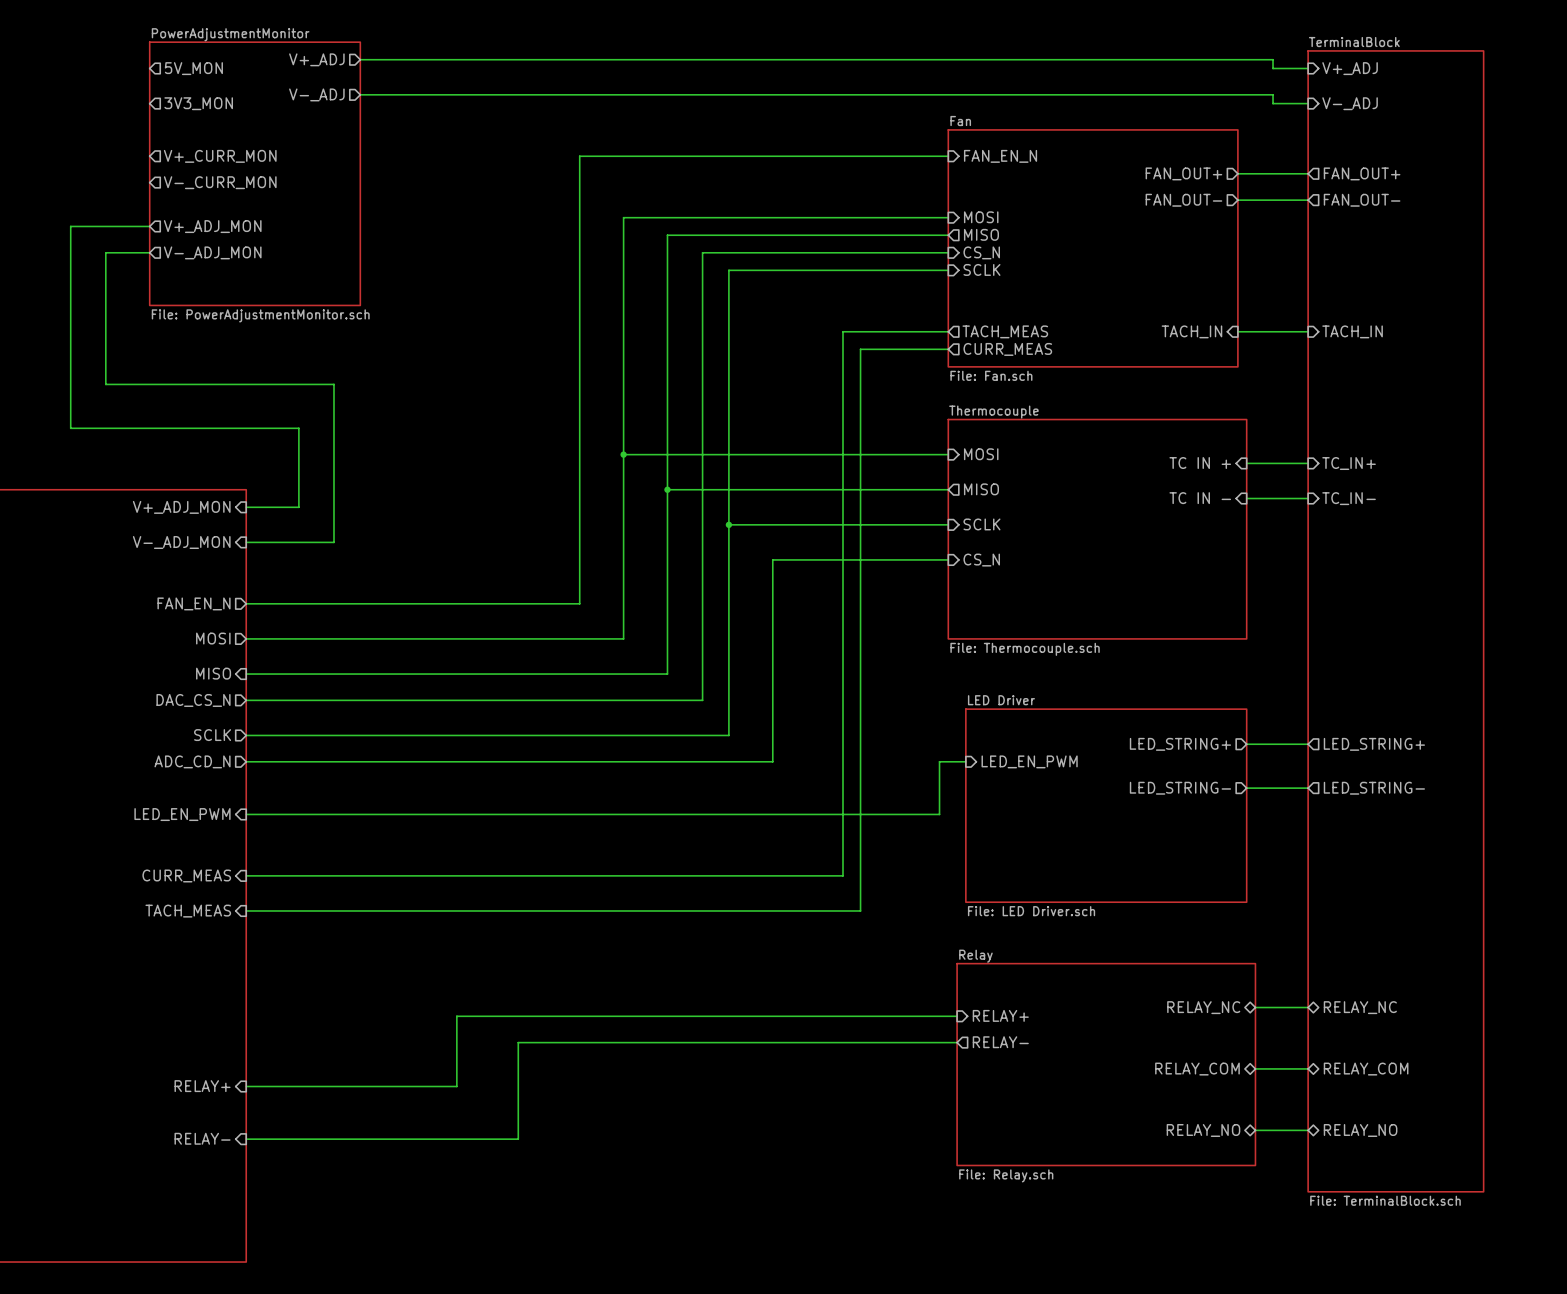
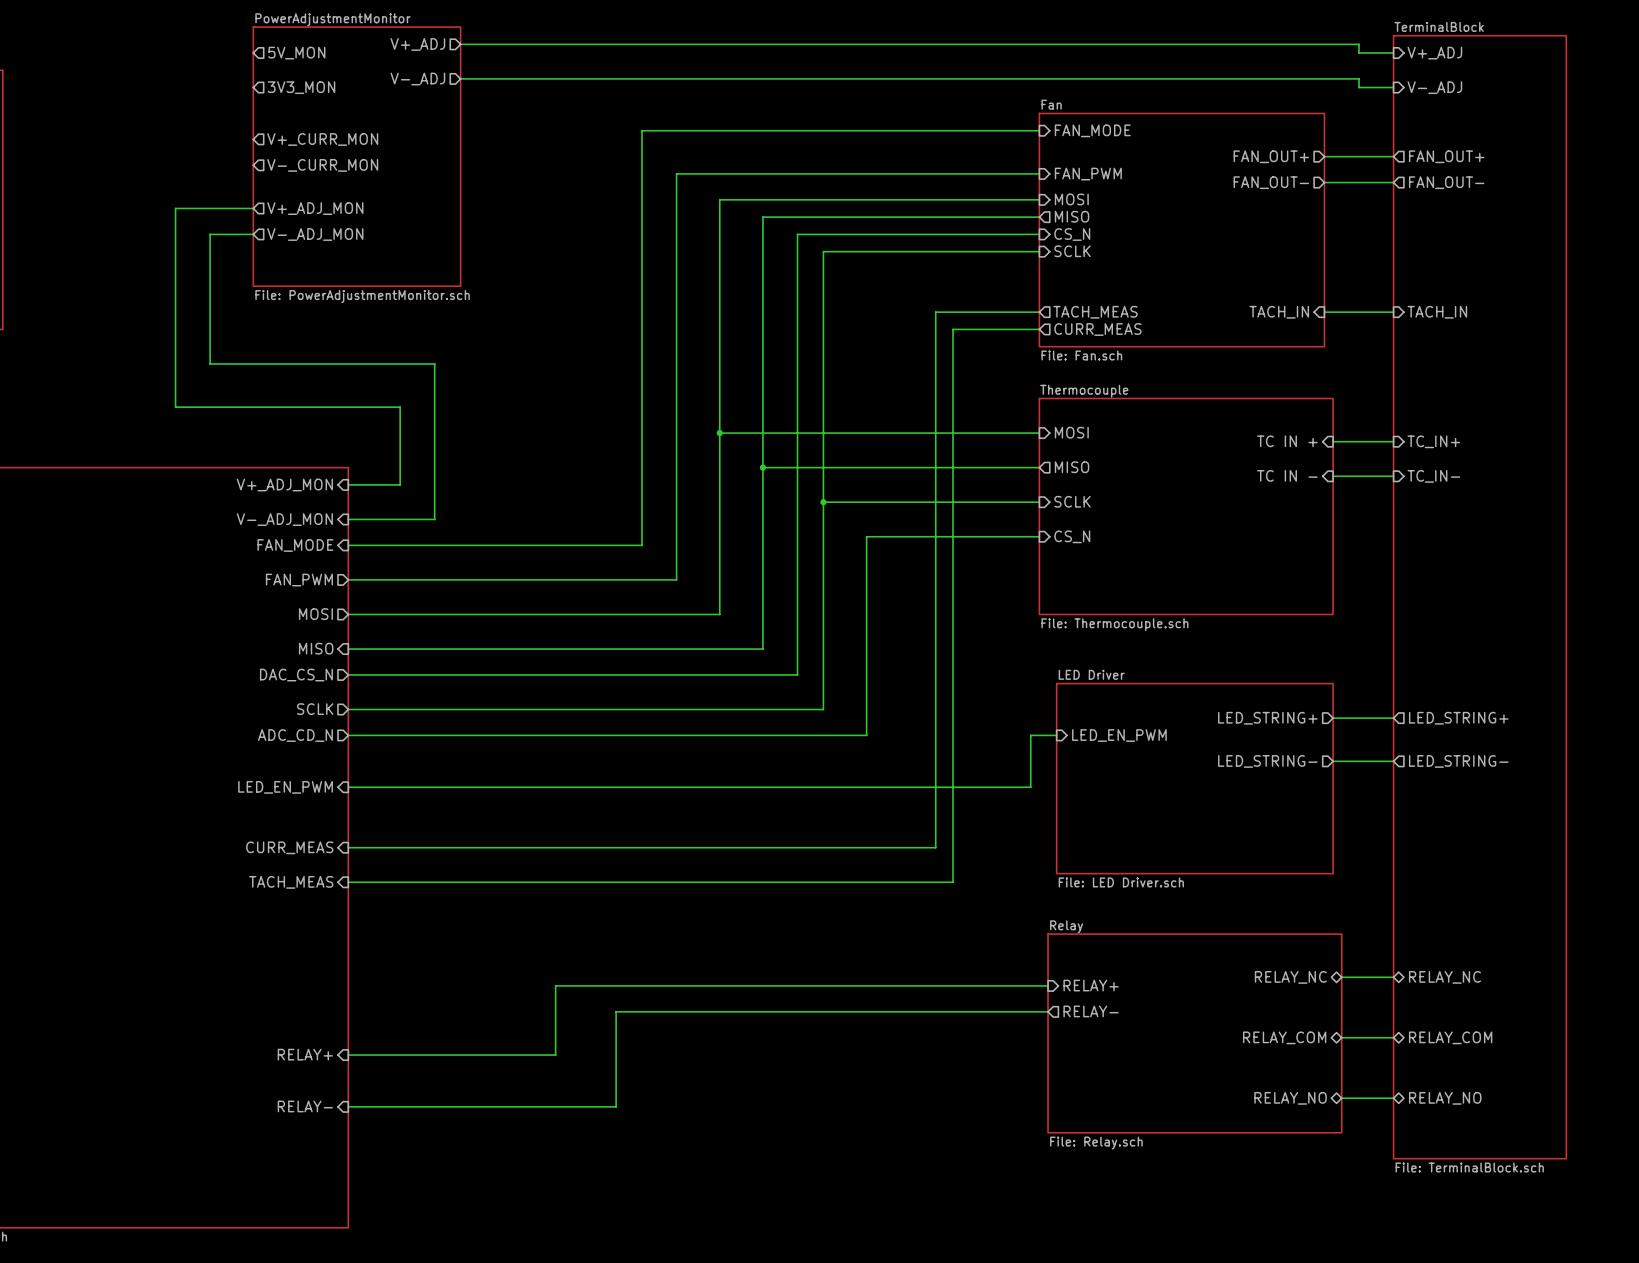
wire: none -> (1039, 130) (642, 130) (642, 545) (348, 545)
wire: (948, 156) (579, 156) (579, 191) -> (1039, 173) (676, 173)
sheet pin: FAN_EN_N (1000, 156) -> FAN_MODE (1092, 130)
sheet pin: none -> FAN_PWM (1088, 174)
sheet pin: none -> FAN_MODE (295, 545)
sheet pin: FAN_EN_N (194, 603) -> FAN_PWM (299, 580)

